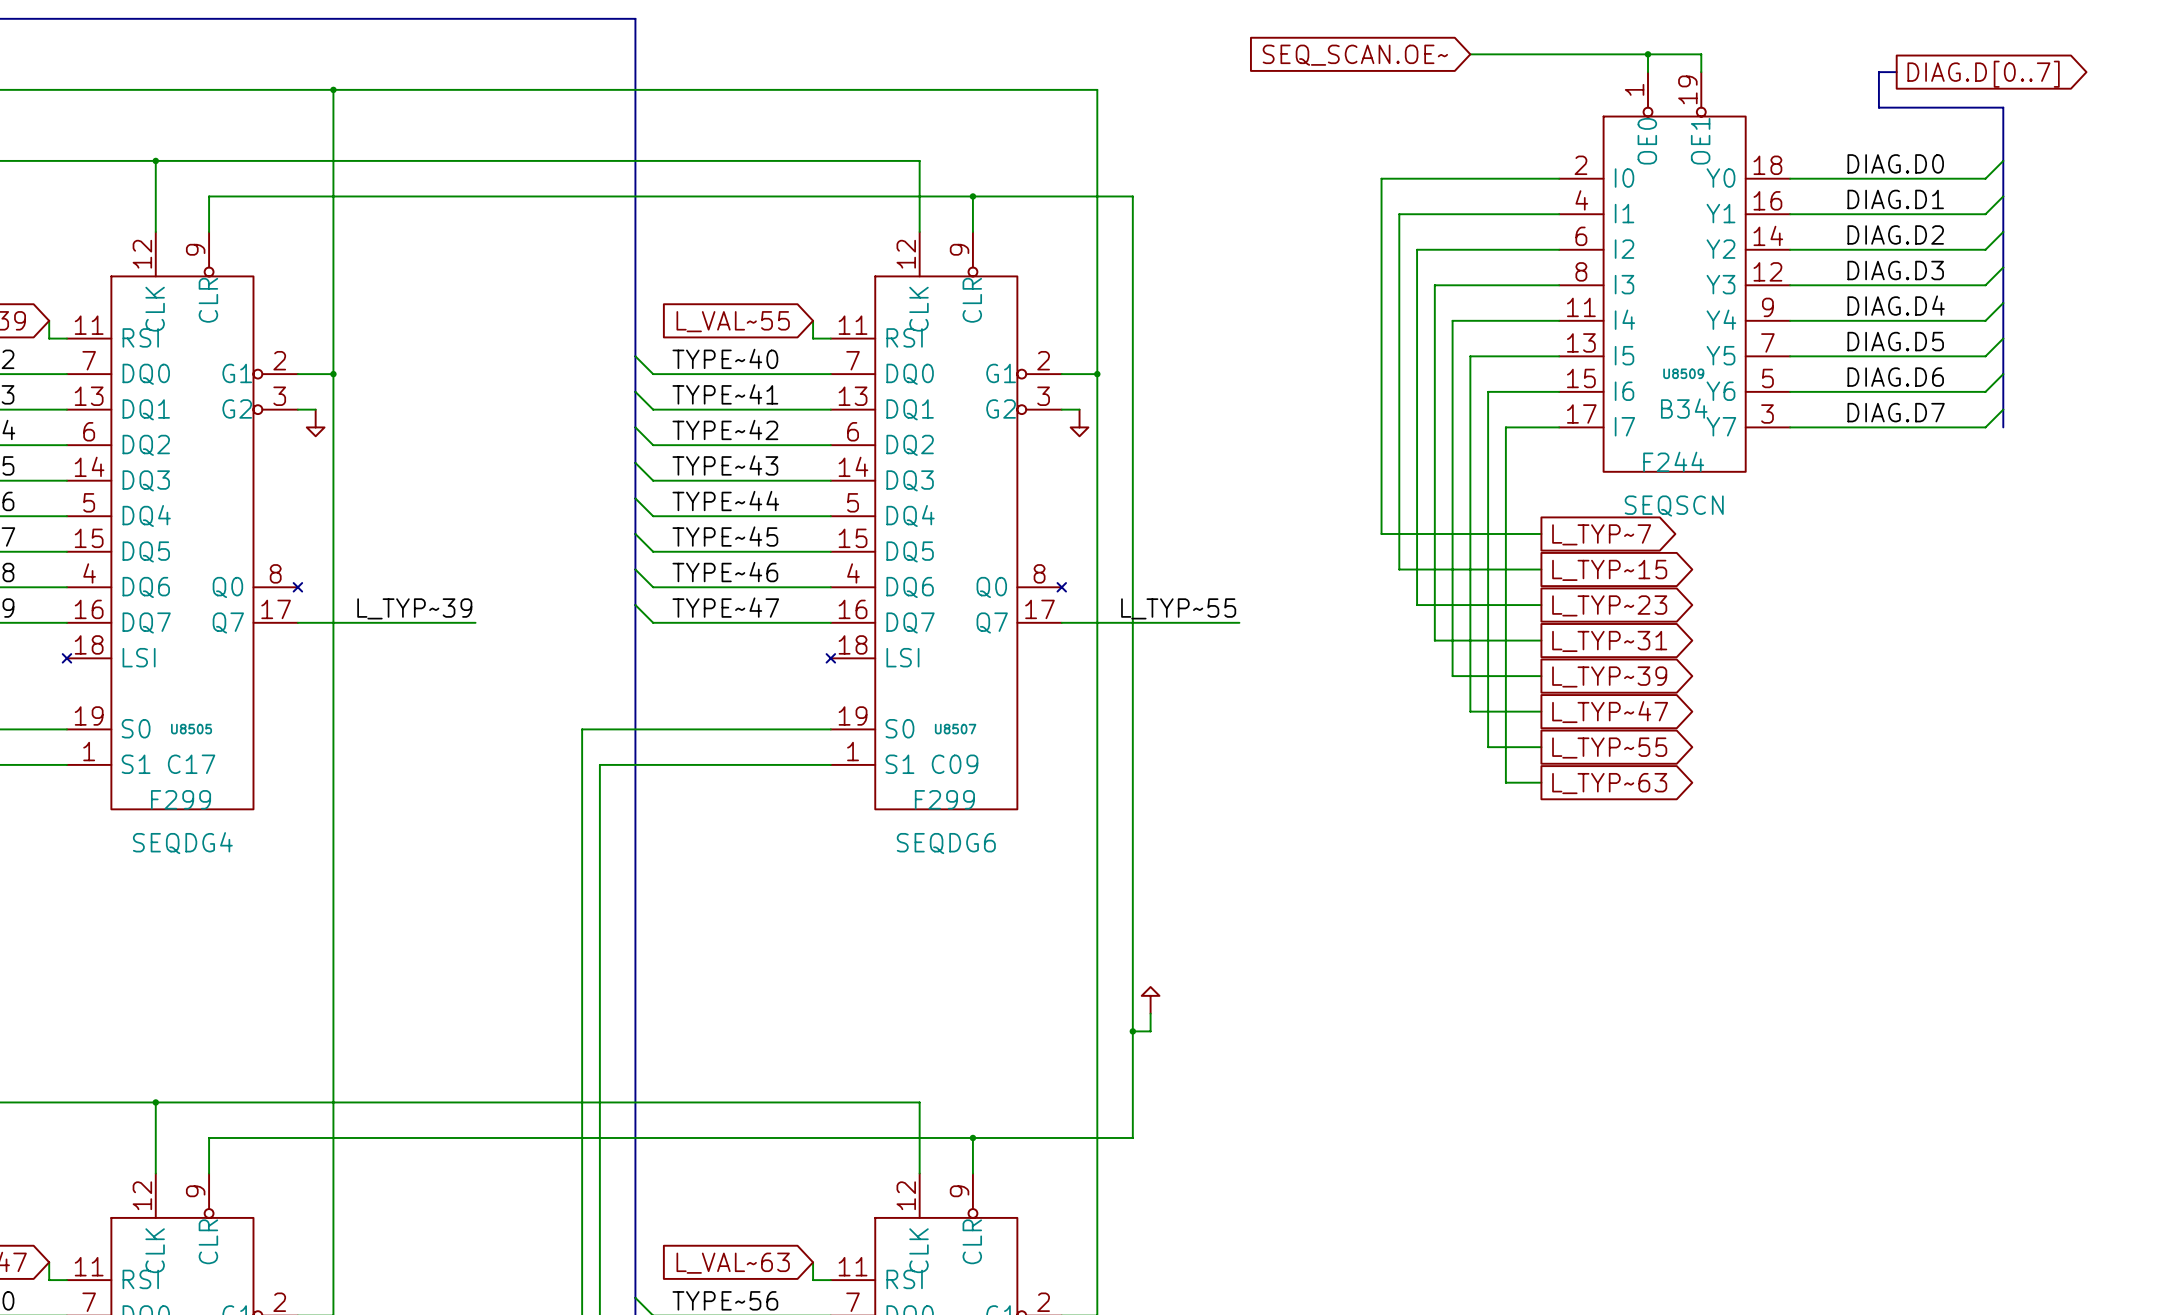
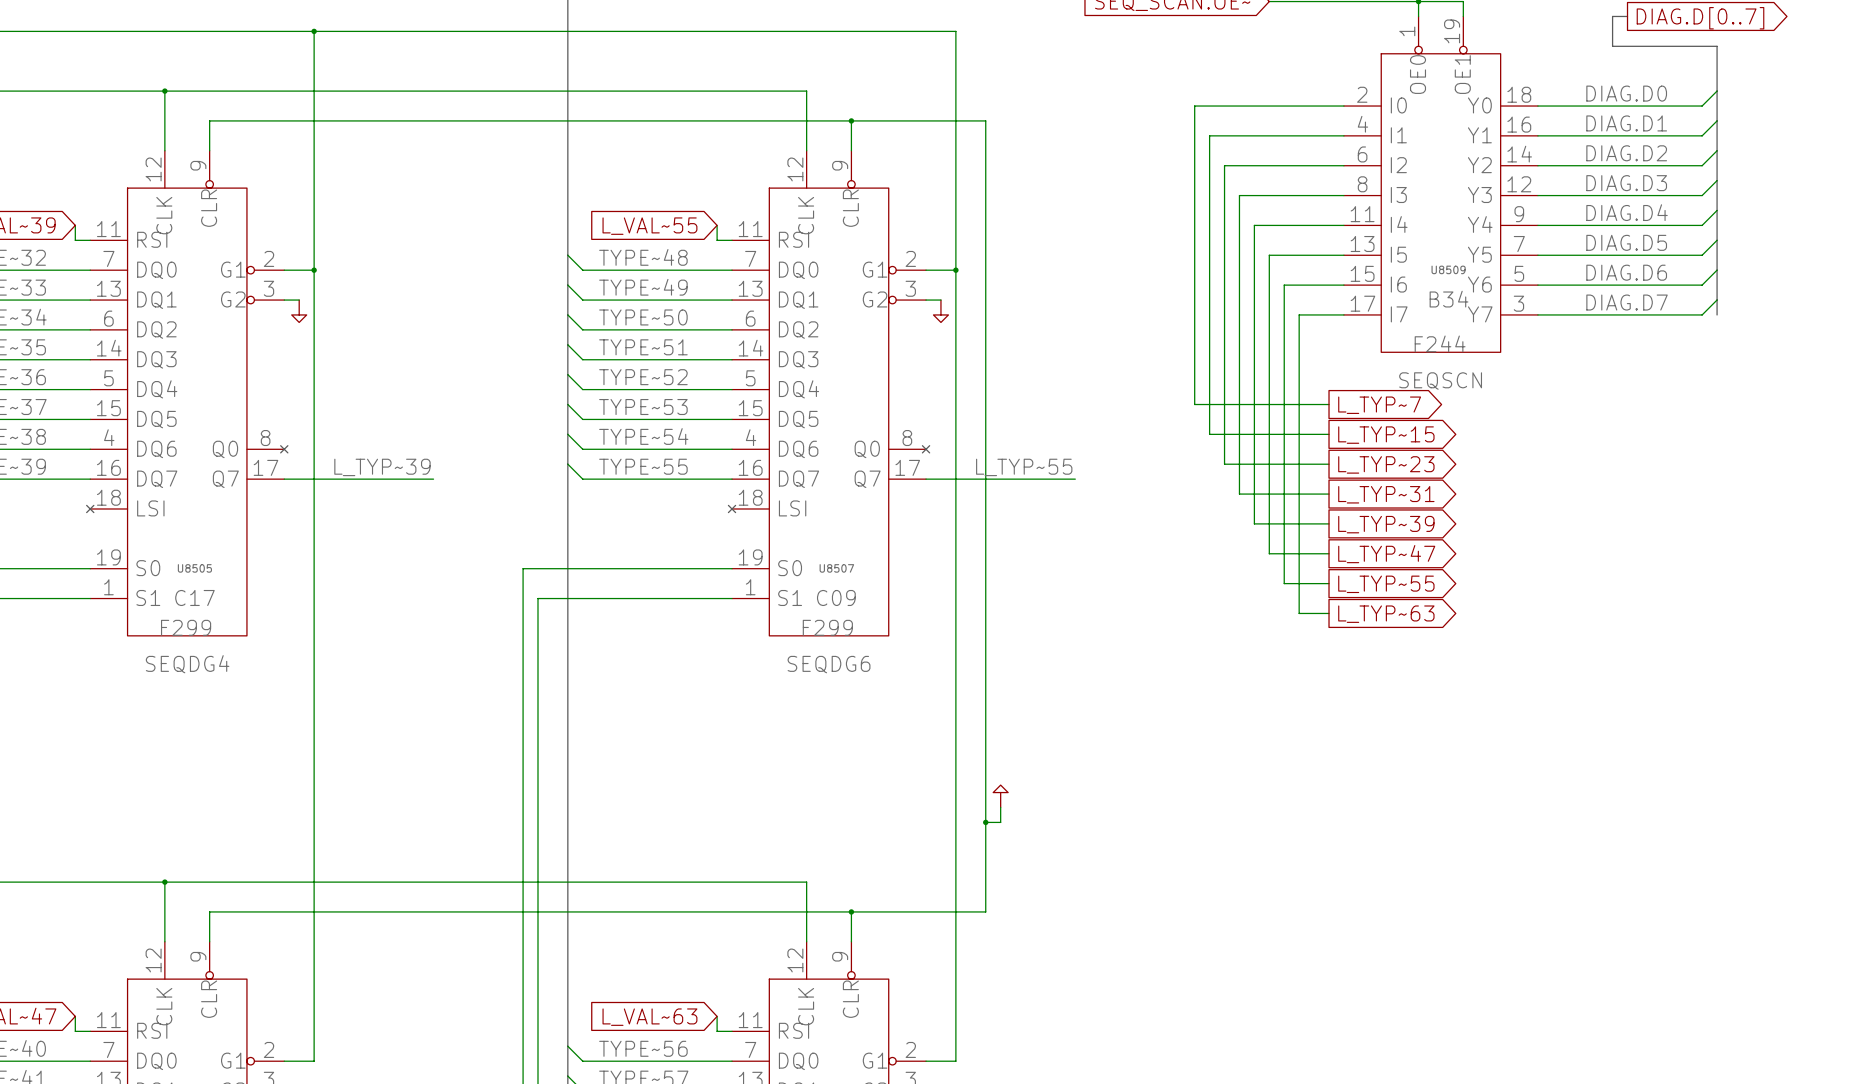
label: TYPE~40 (725, 358) -> TYPE~48 (643, 257)
label: TYPE~41 (725, 394) -> TYPE~49 (643, 287)
label: TYPE~42 (725, 429) -> TYPE~50 (643, 317)
label: TYPE~43 (725, 465) -> TYPE~51 (643, 347)
label: TYPE~44 (725, 501) -> TYPE~52 (643, 377)
label: TYPE~45 (725, 536) -> TYPE~53 (643, 407)
label: TYPE~46 (725, 572) -> TYPE~54 (643, 436)
label: TYPE~47 (725, 607) -> TYPE~55 (643, 466)

